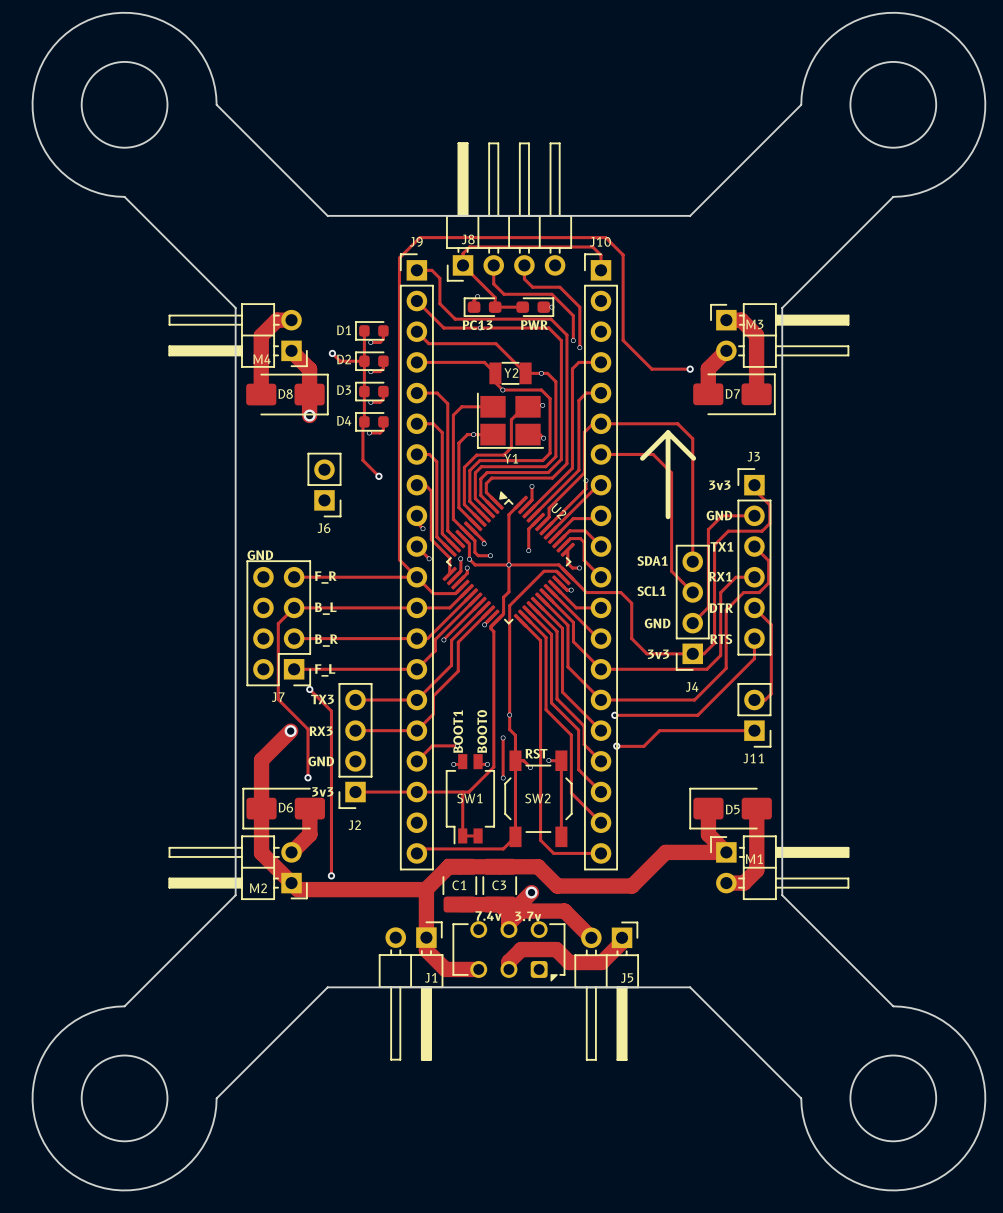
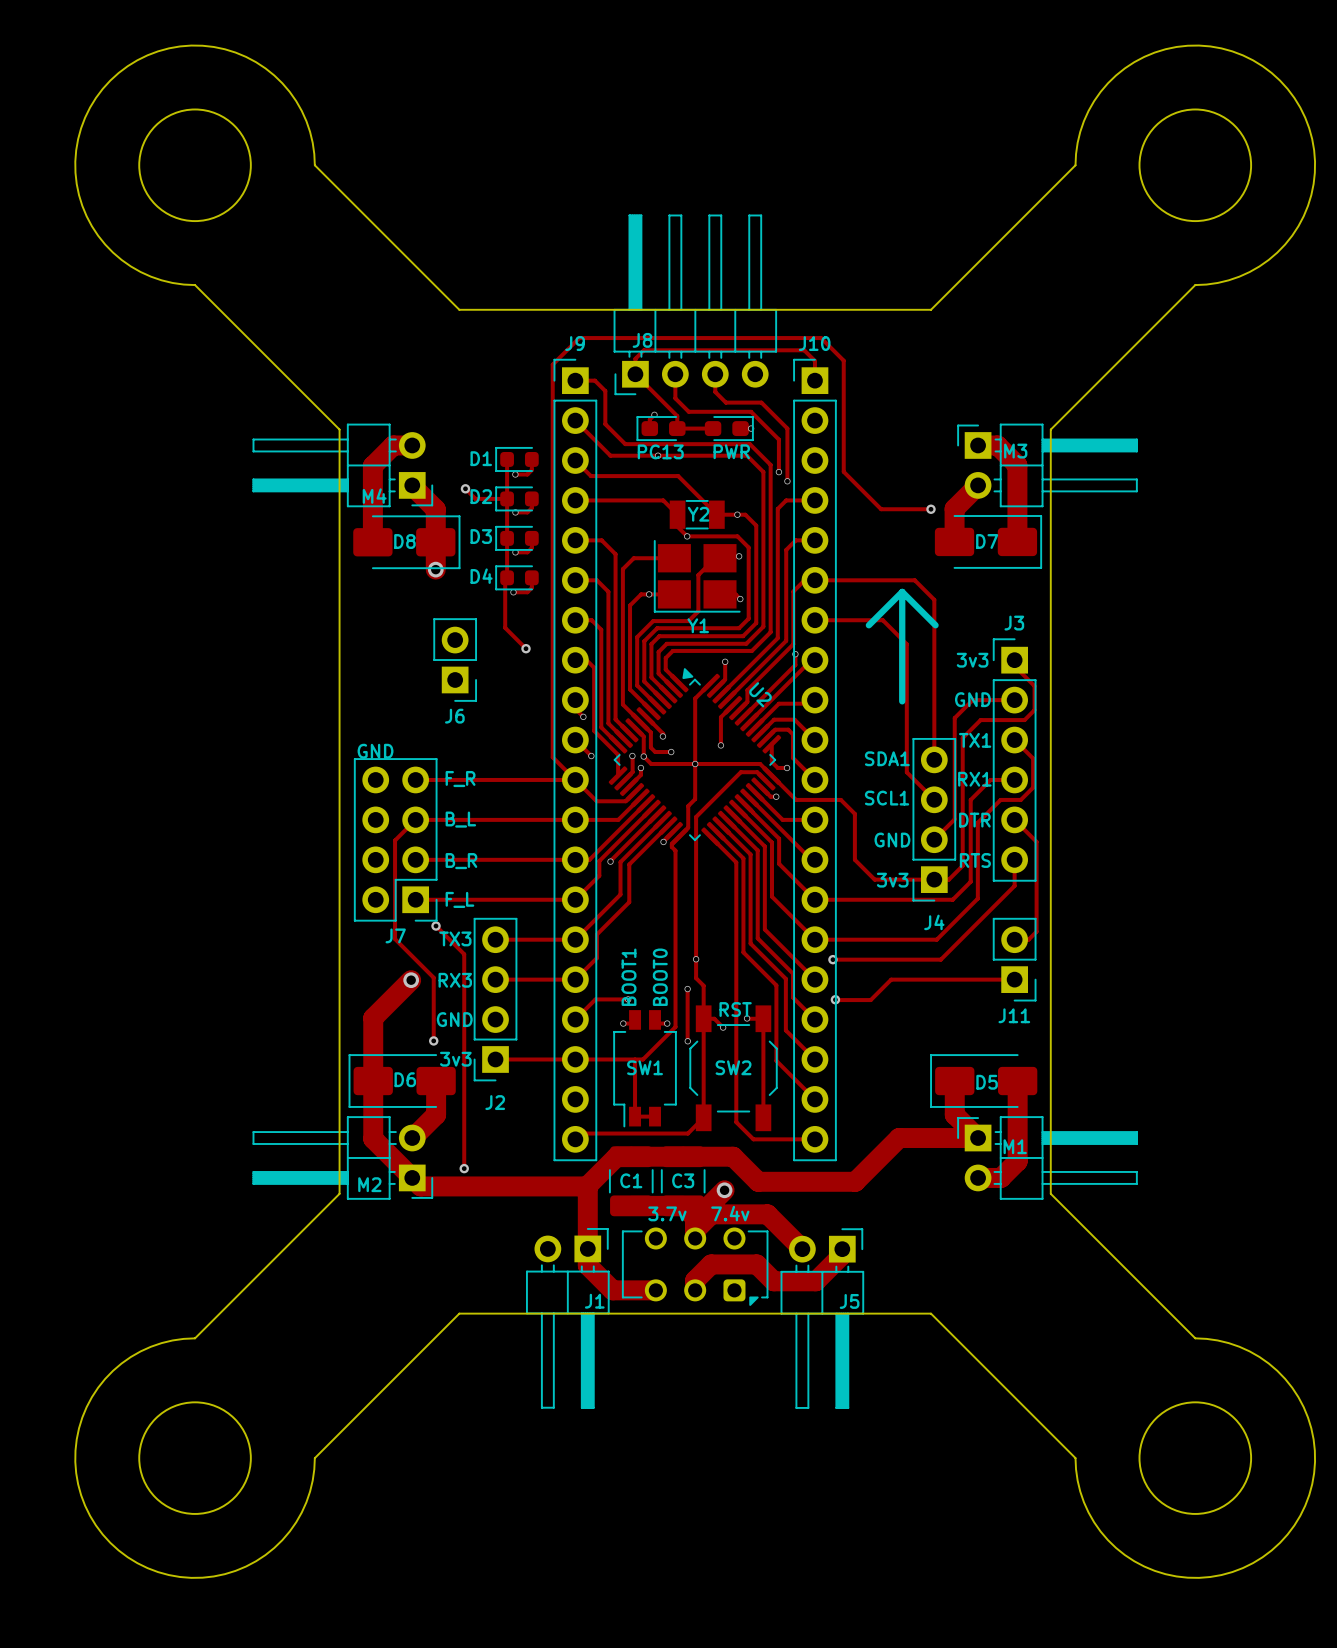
text position: 7.4v (488, 915) -> 7.4v (730, 1213)
text position: 3.7v (528, 916) -> 3.7v (667, 1213)

